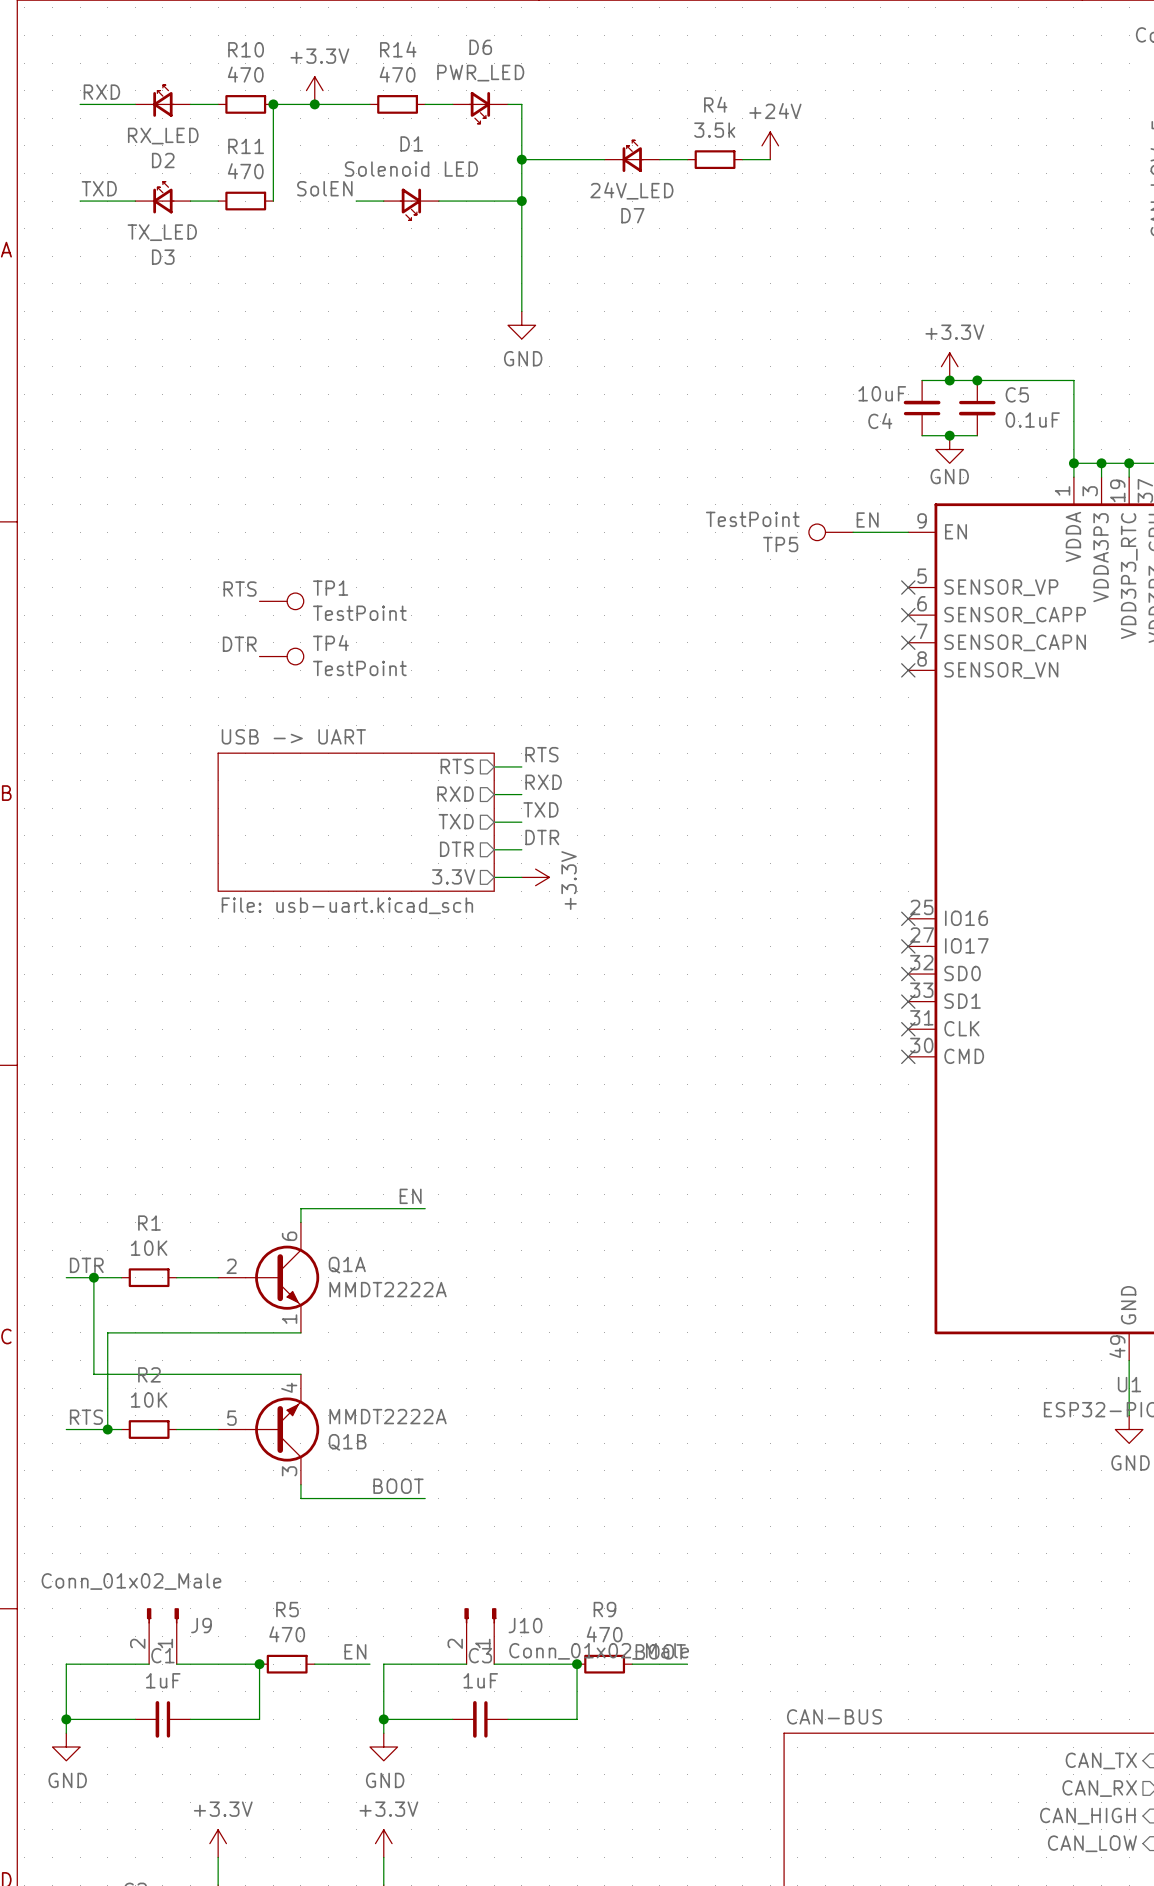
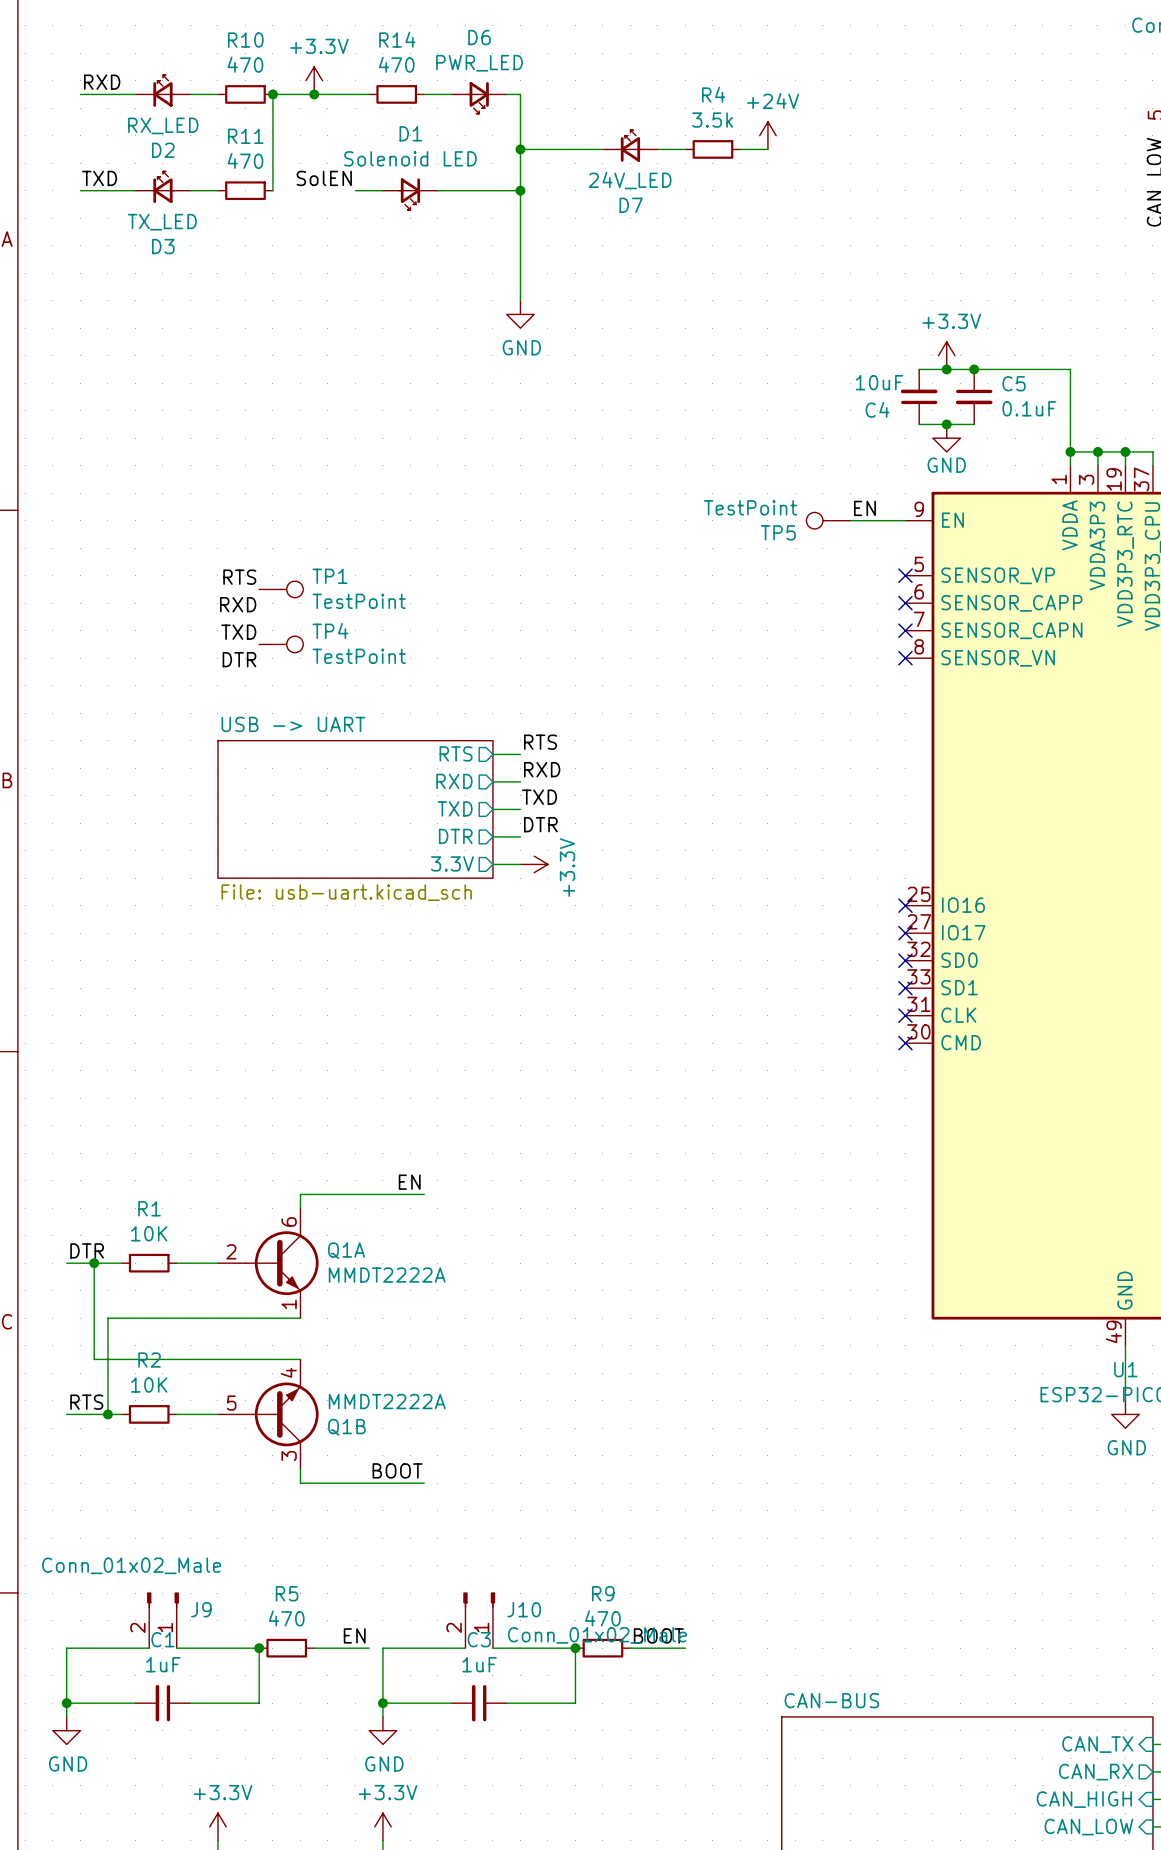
label: none -> RXD (238, 604)
label: DTR (239, 644) -> TXD (238, 632)
label: none -> DTR (239, 659)

